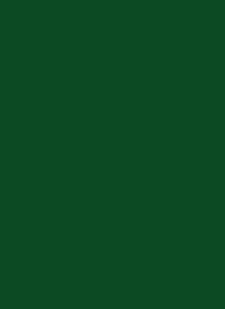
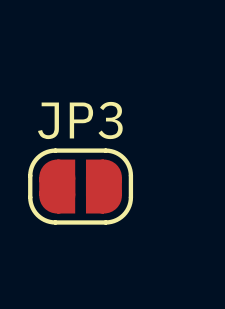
JP3: none -> (80, 186)

